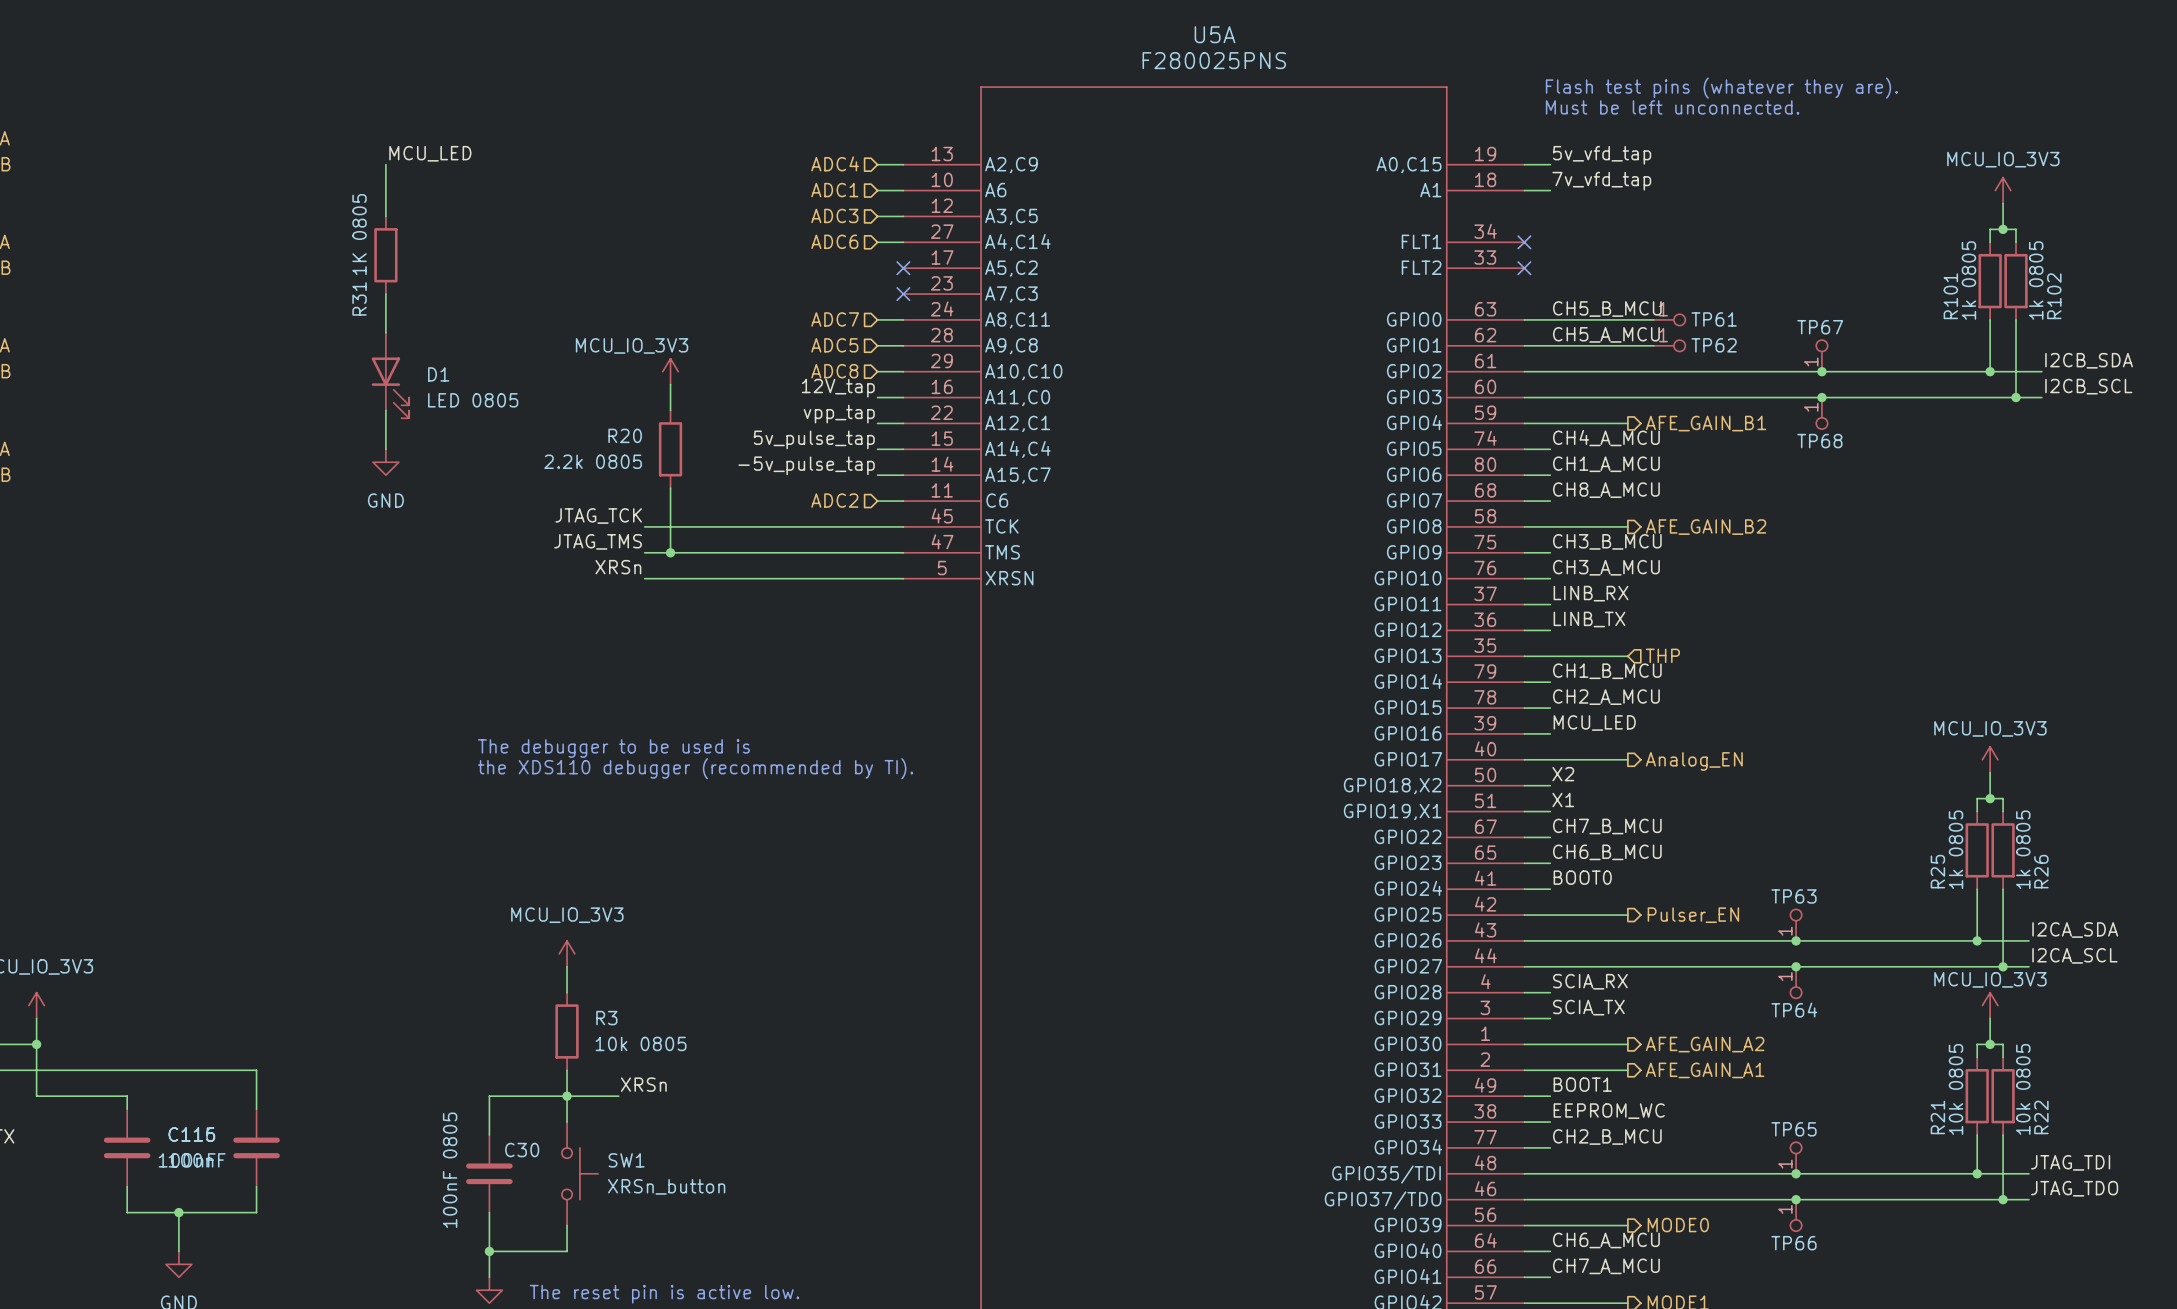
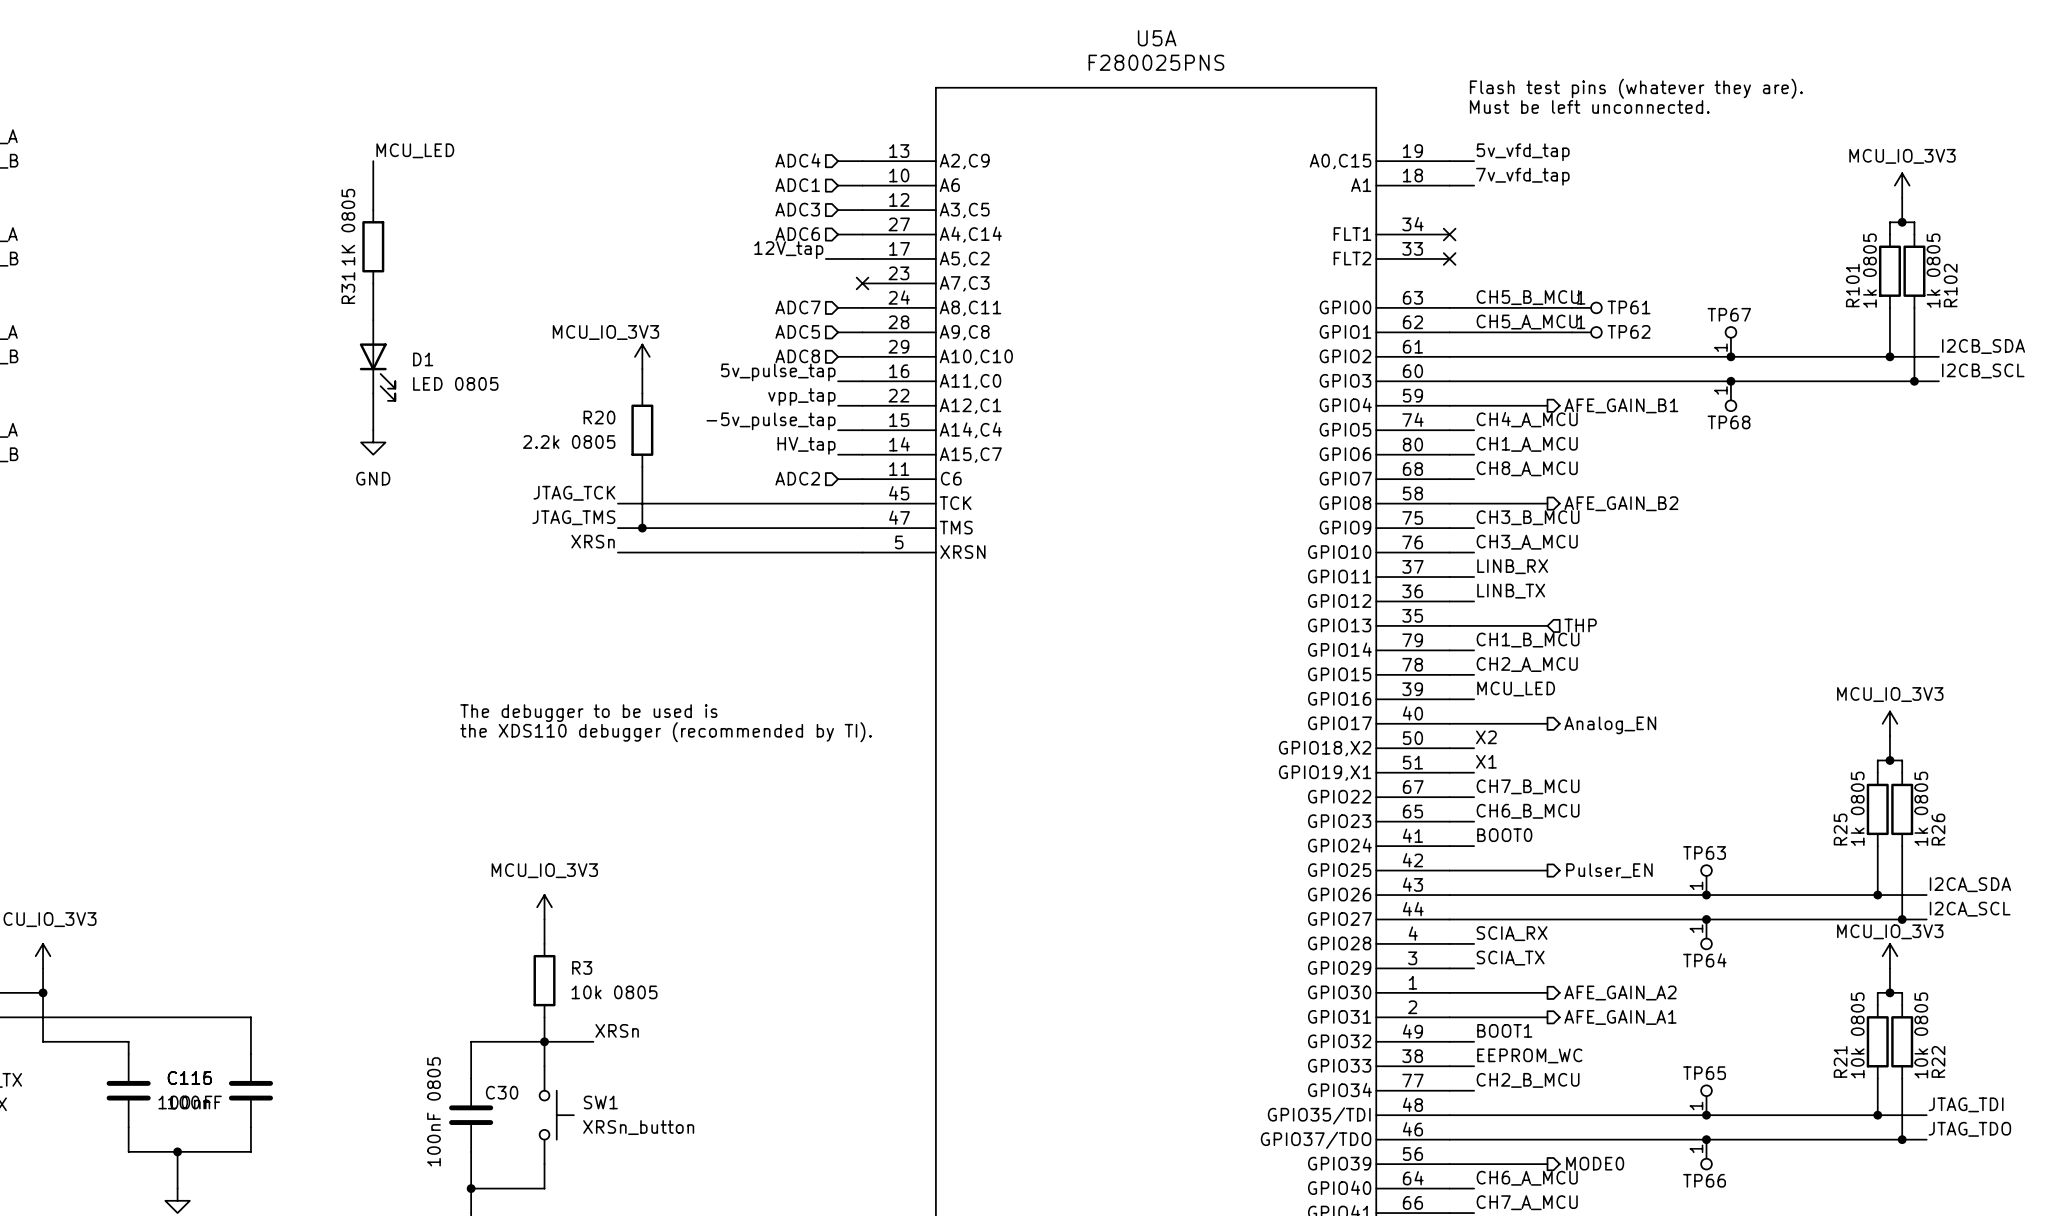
label: none -> 12V_tap (788, 250)
wire: none -> (825, 258) (862, 258)
no-connect mark: (903, 268) -> none
label: 12V_tap (838, 388) -> 5v_pulse_tap (778, 372)
label: 5v_pulse_tap (814, 439) -> -5v_pulse_tap (771, 421)
label: -5v_pulse_tap (806, 465) -> HV_tap (806, 445)

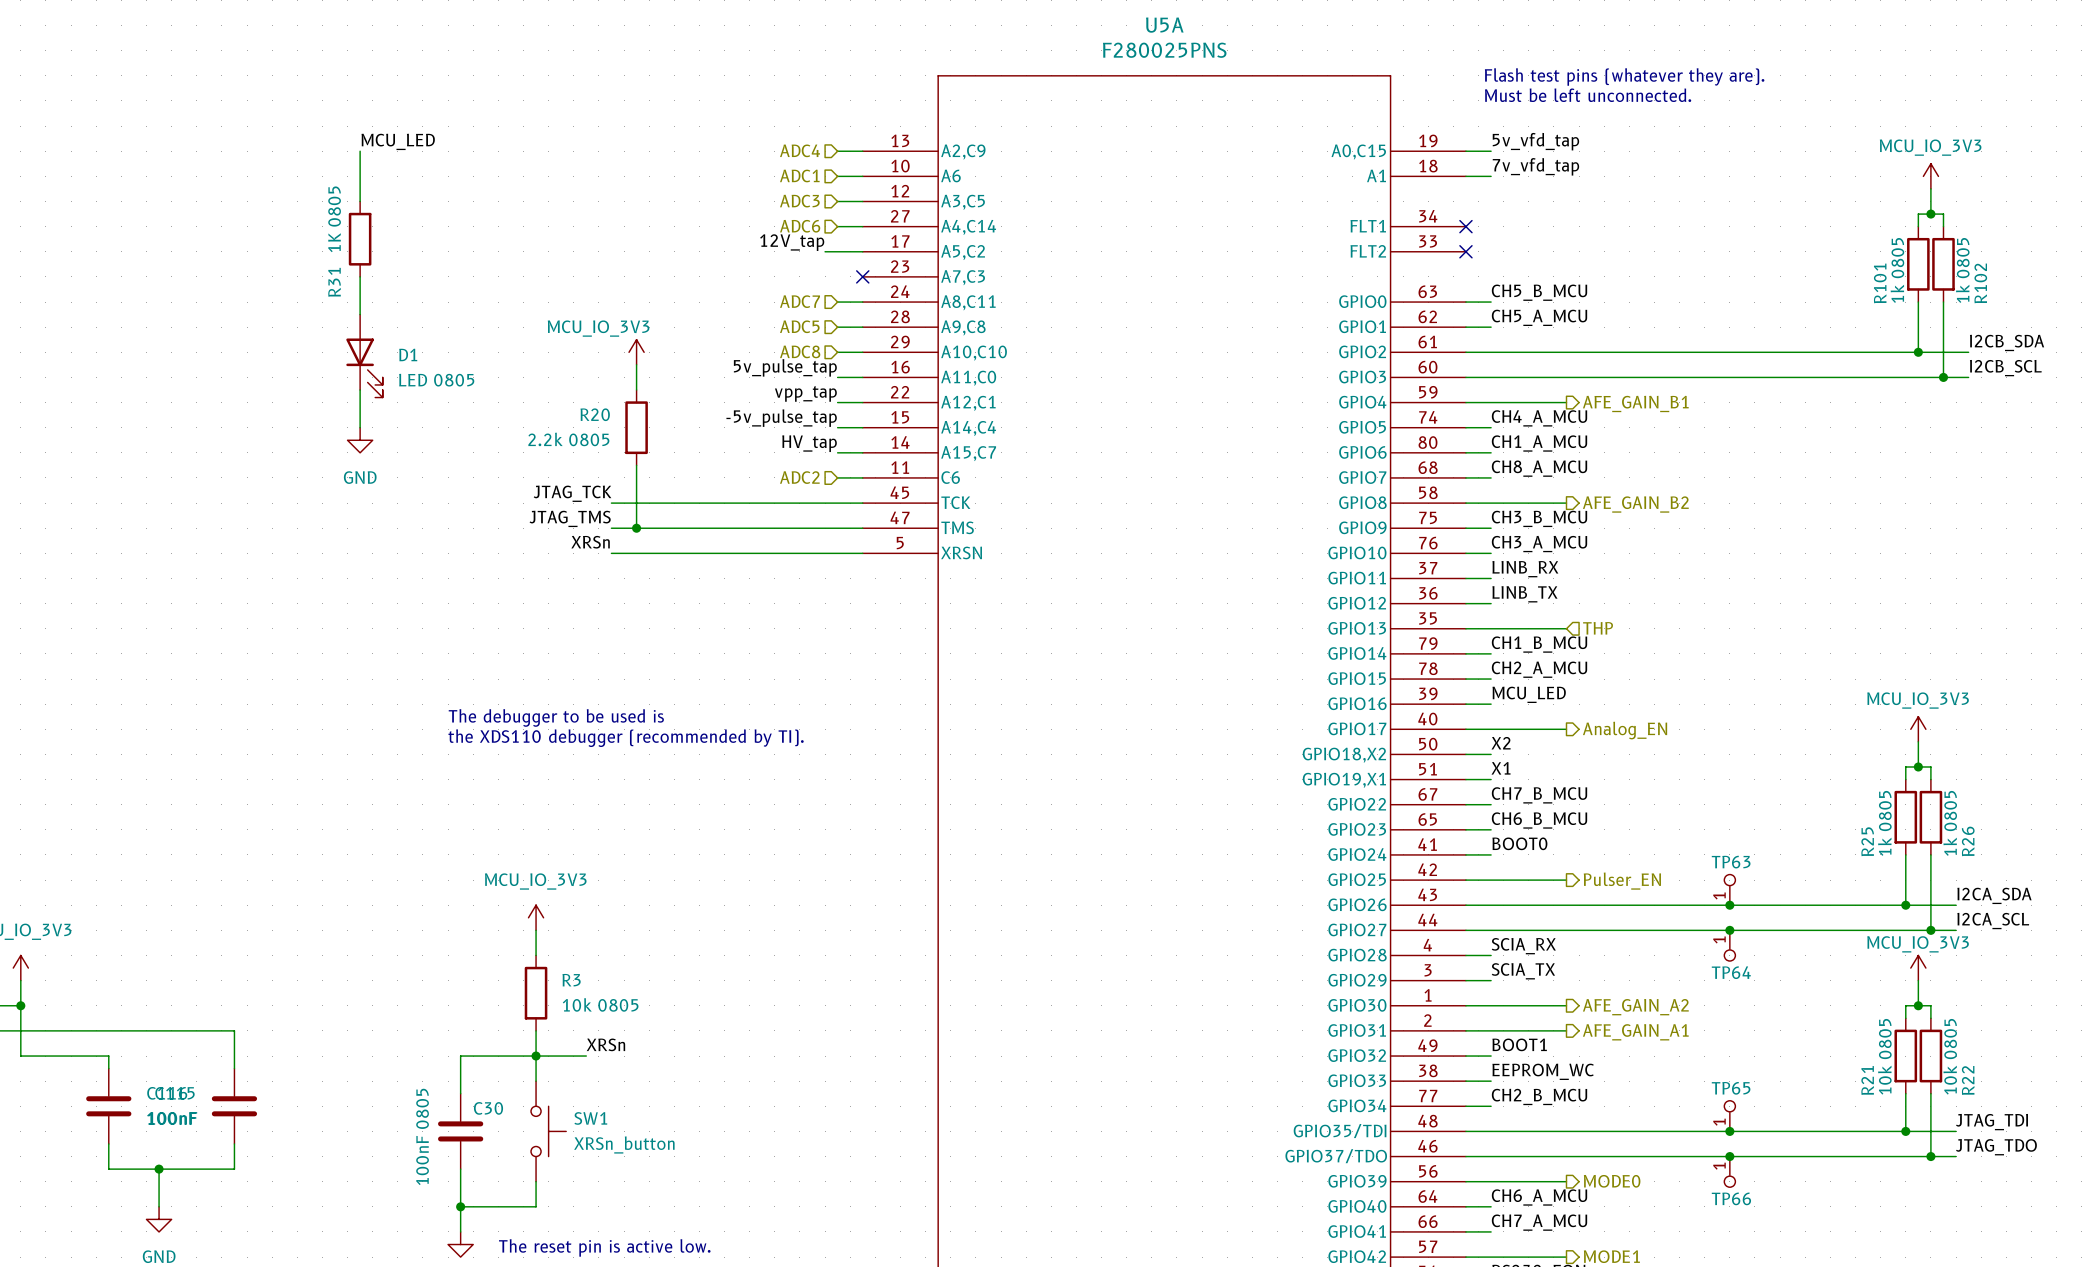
wire: (1474, 307) (1571, 307) -> none
TP61: (1586, 307) -> none
wire: (1474, 332) (1571, 332) -> none
TP62: (1586, 332) -> none
TP67: (1730, 341) -> none
junction: (1730, 356) -> none
junction: (1730, 381) -> none
TP68: (1730, 396) -> none

